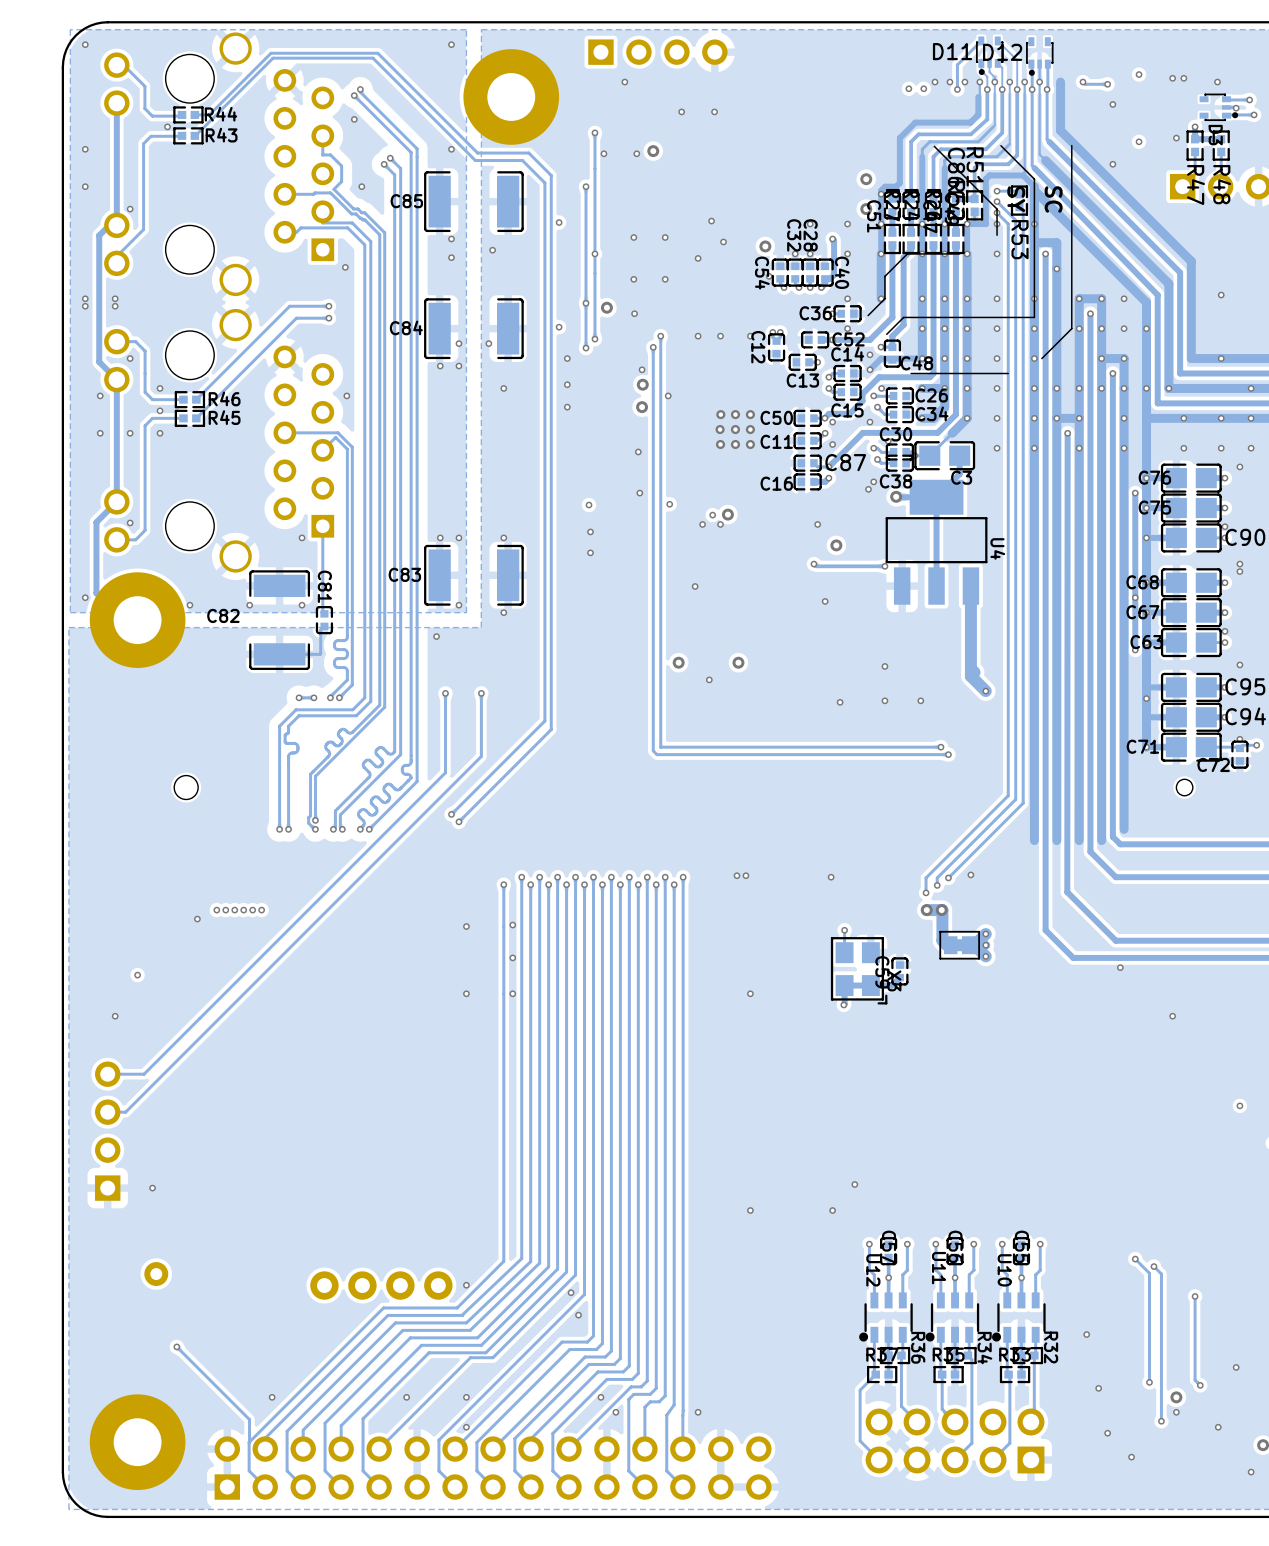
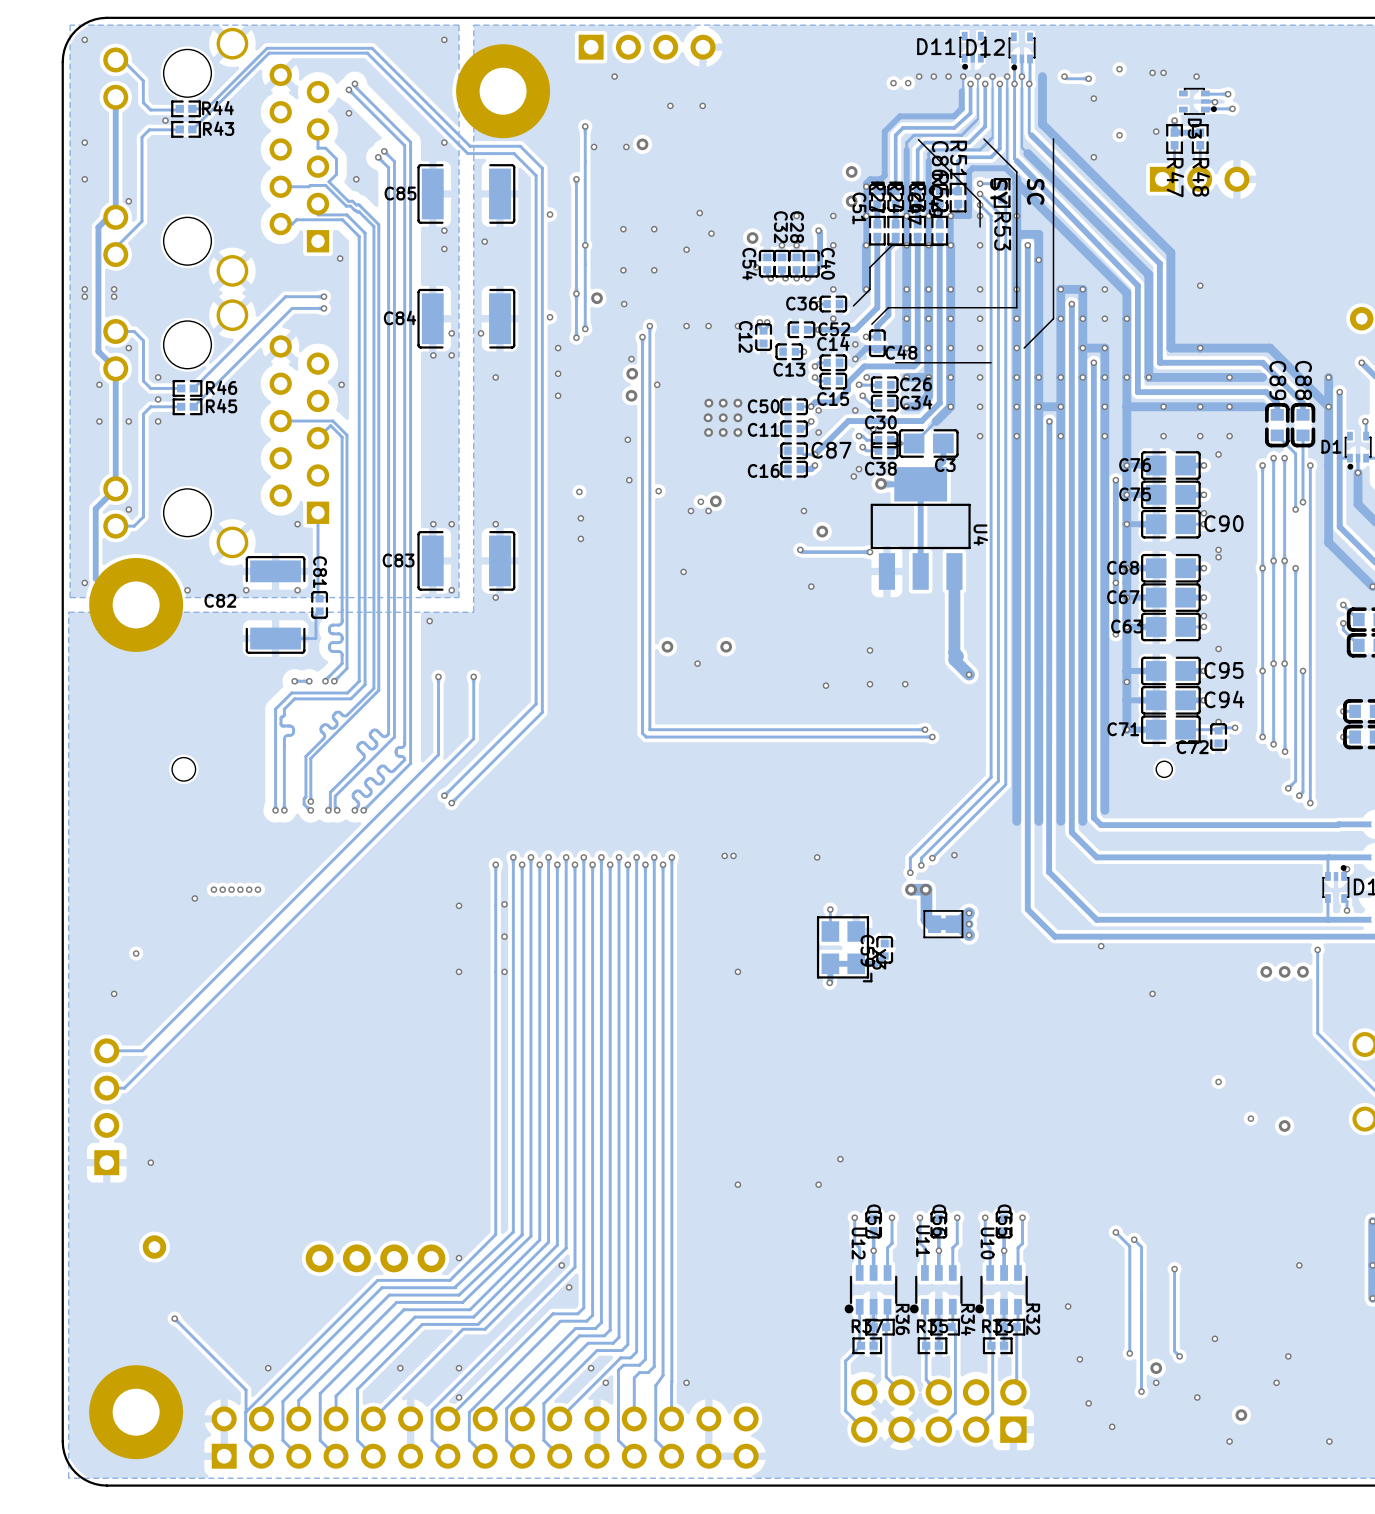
track: (981, 40) (957, 64) (957, 89) -> none
track: (997, 40) (1017, 60) (1017, 89) -> none
track: (981, 63) (981, 70) (987, 76) (987, 89) -> none
track: (989, 63) (989, 72) (994, 77) (994, 82) -> none
track: (997, 63) (1002, 67) (1002, 89) -> none
via: (957, 89) -> none

